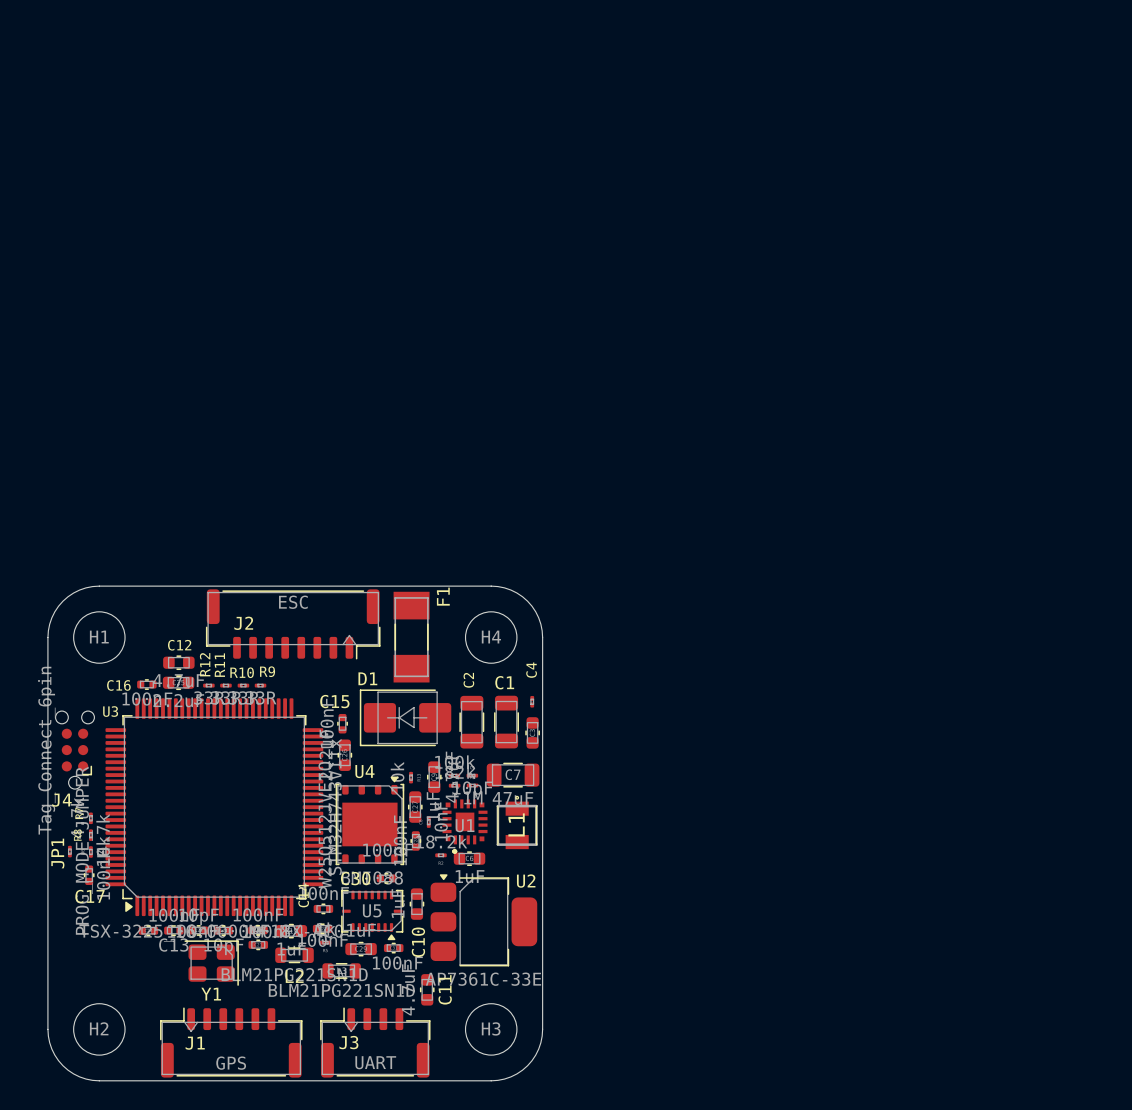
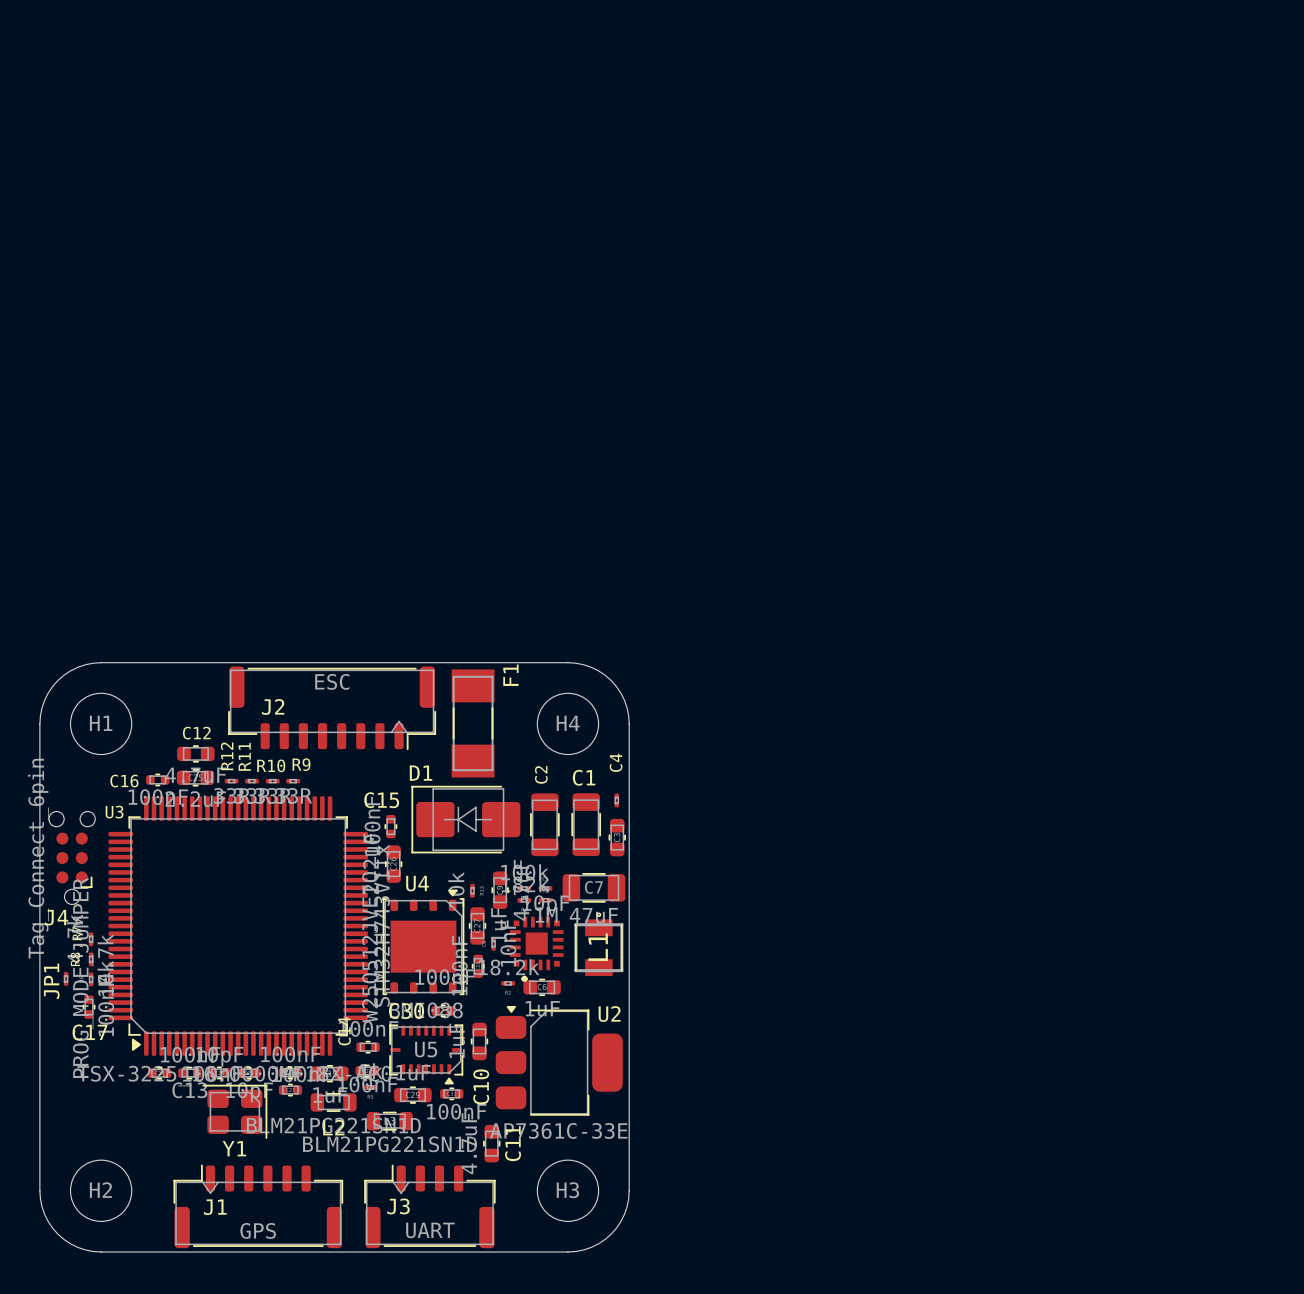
part text: U1 (465, 825) -> none

